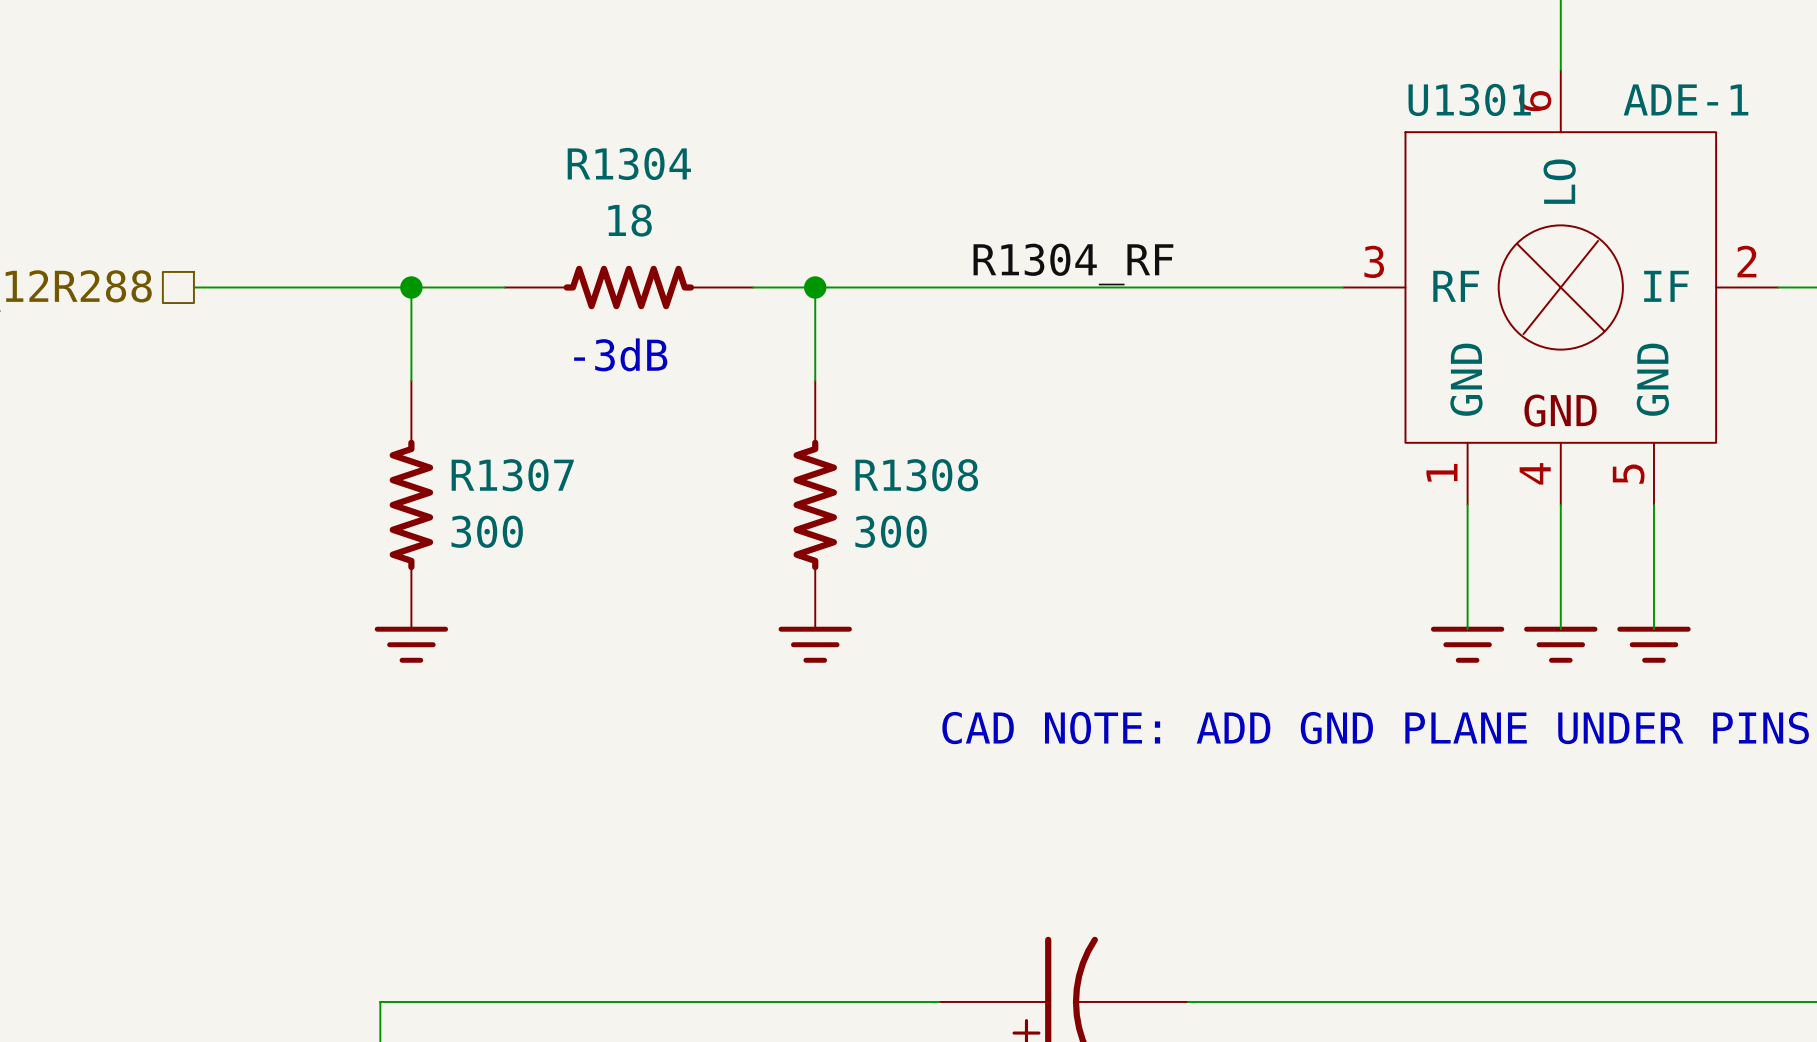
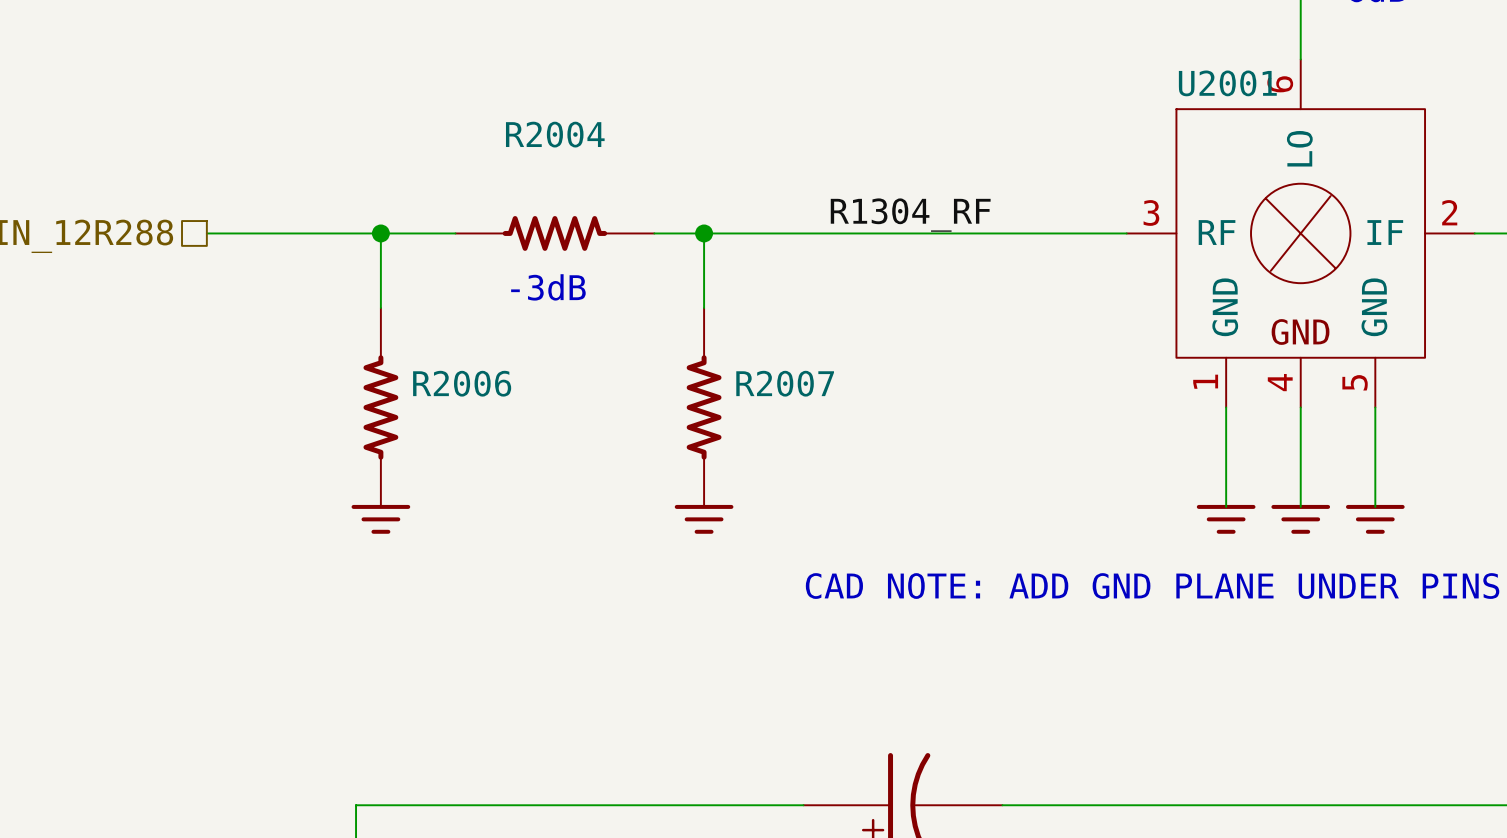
U1301 name: U1301 (1469, 99) -> U2001 (1227, 83)
U1301 value: ADE-1 (1686, 99) -> none
R1304 name: R1304 (629, 163) -> R2004 (555, 134)
R1304 value: 18 (630, 220) -> none
R1307 name: R1307 (512, 475) -> R2006 (462, 383)
R1308 name: R1308 (916, 475) -> R2007 (785, 383)
R1307 value: 300 (487, 531) -> none
R1308 value: 300 (891, 531) -> none

